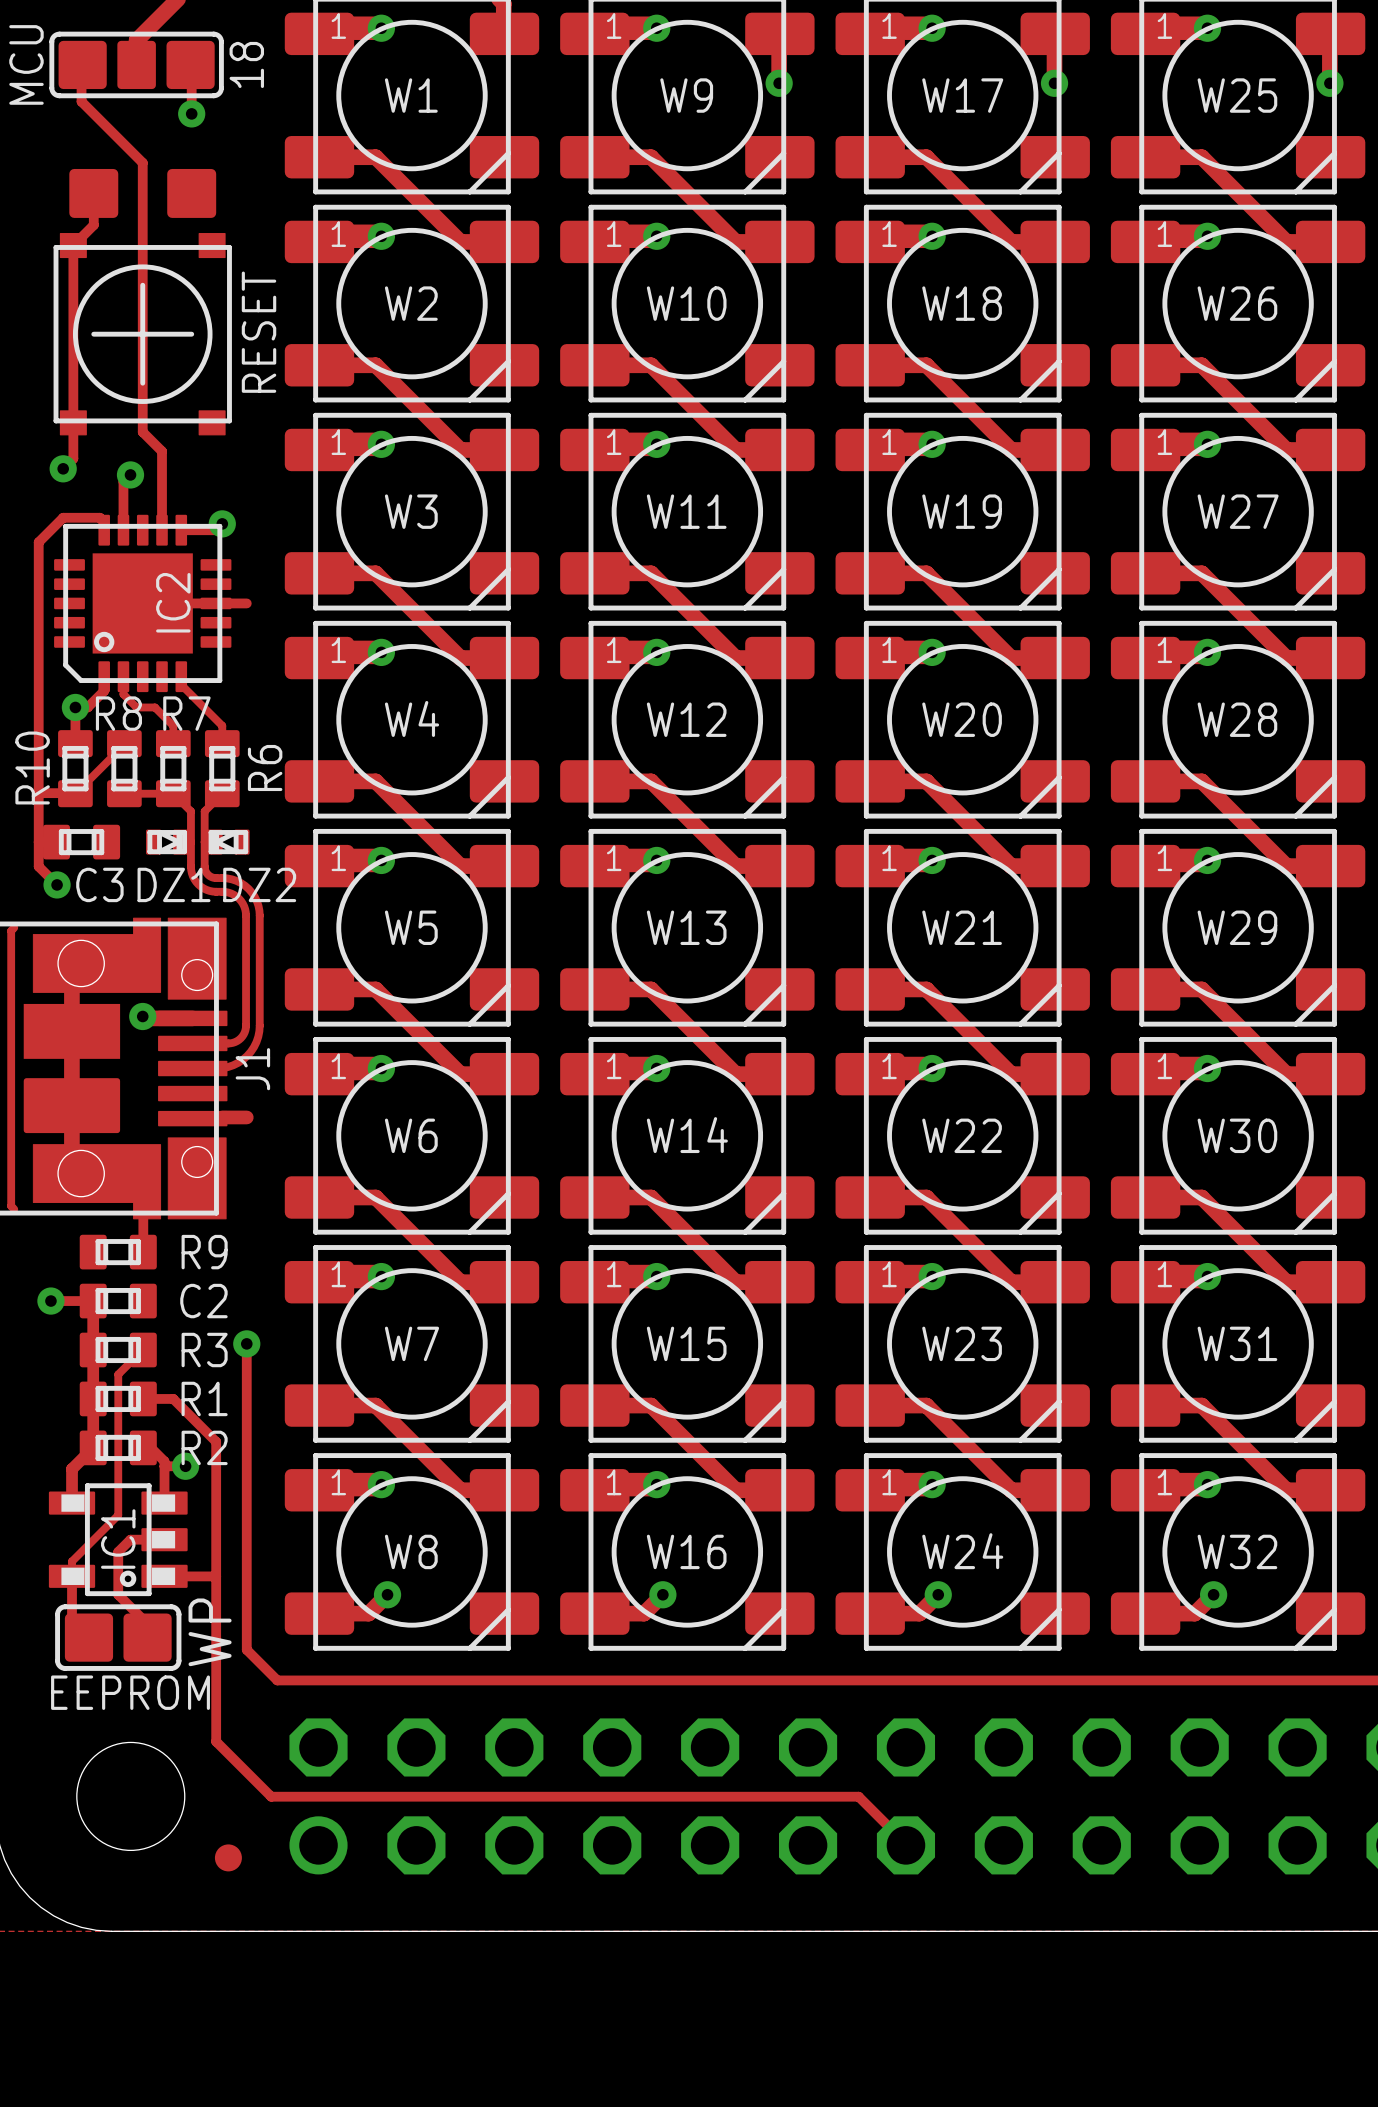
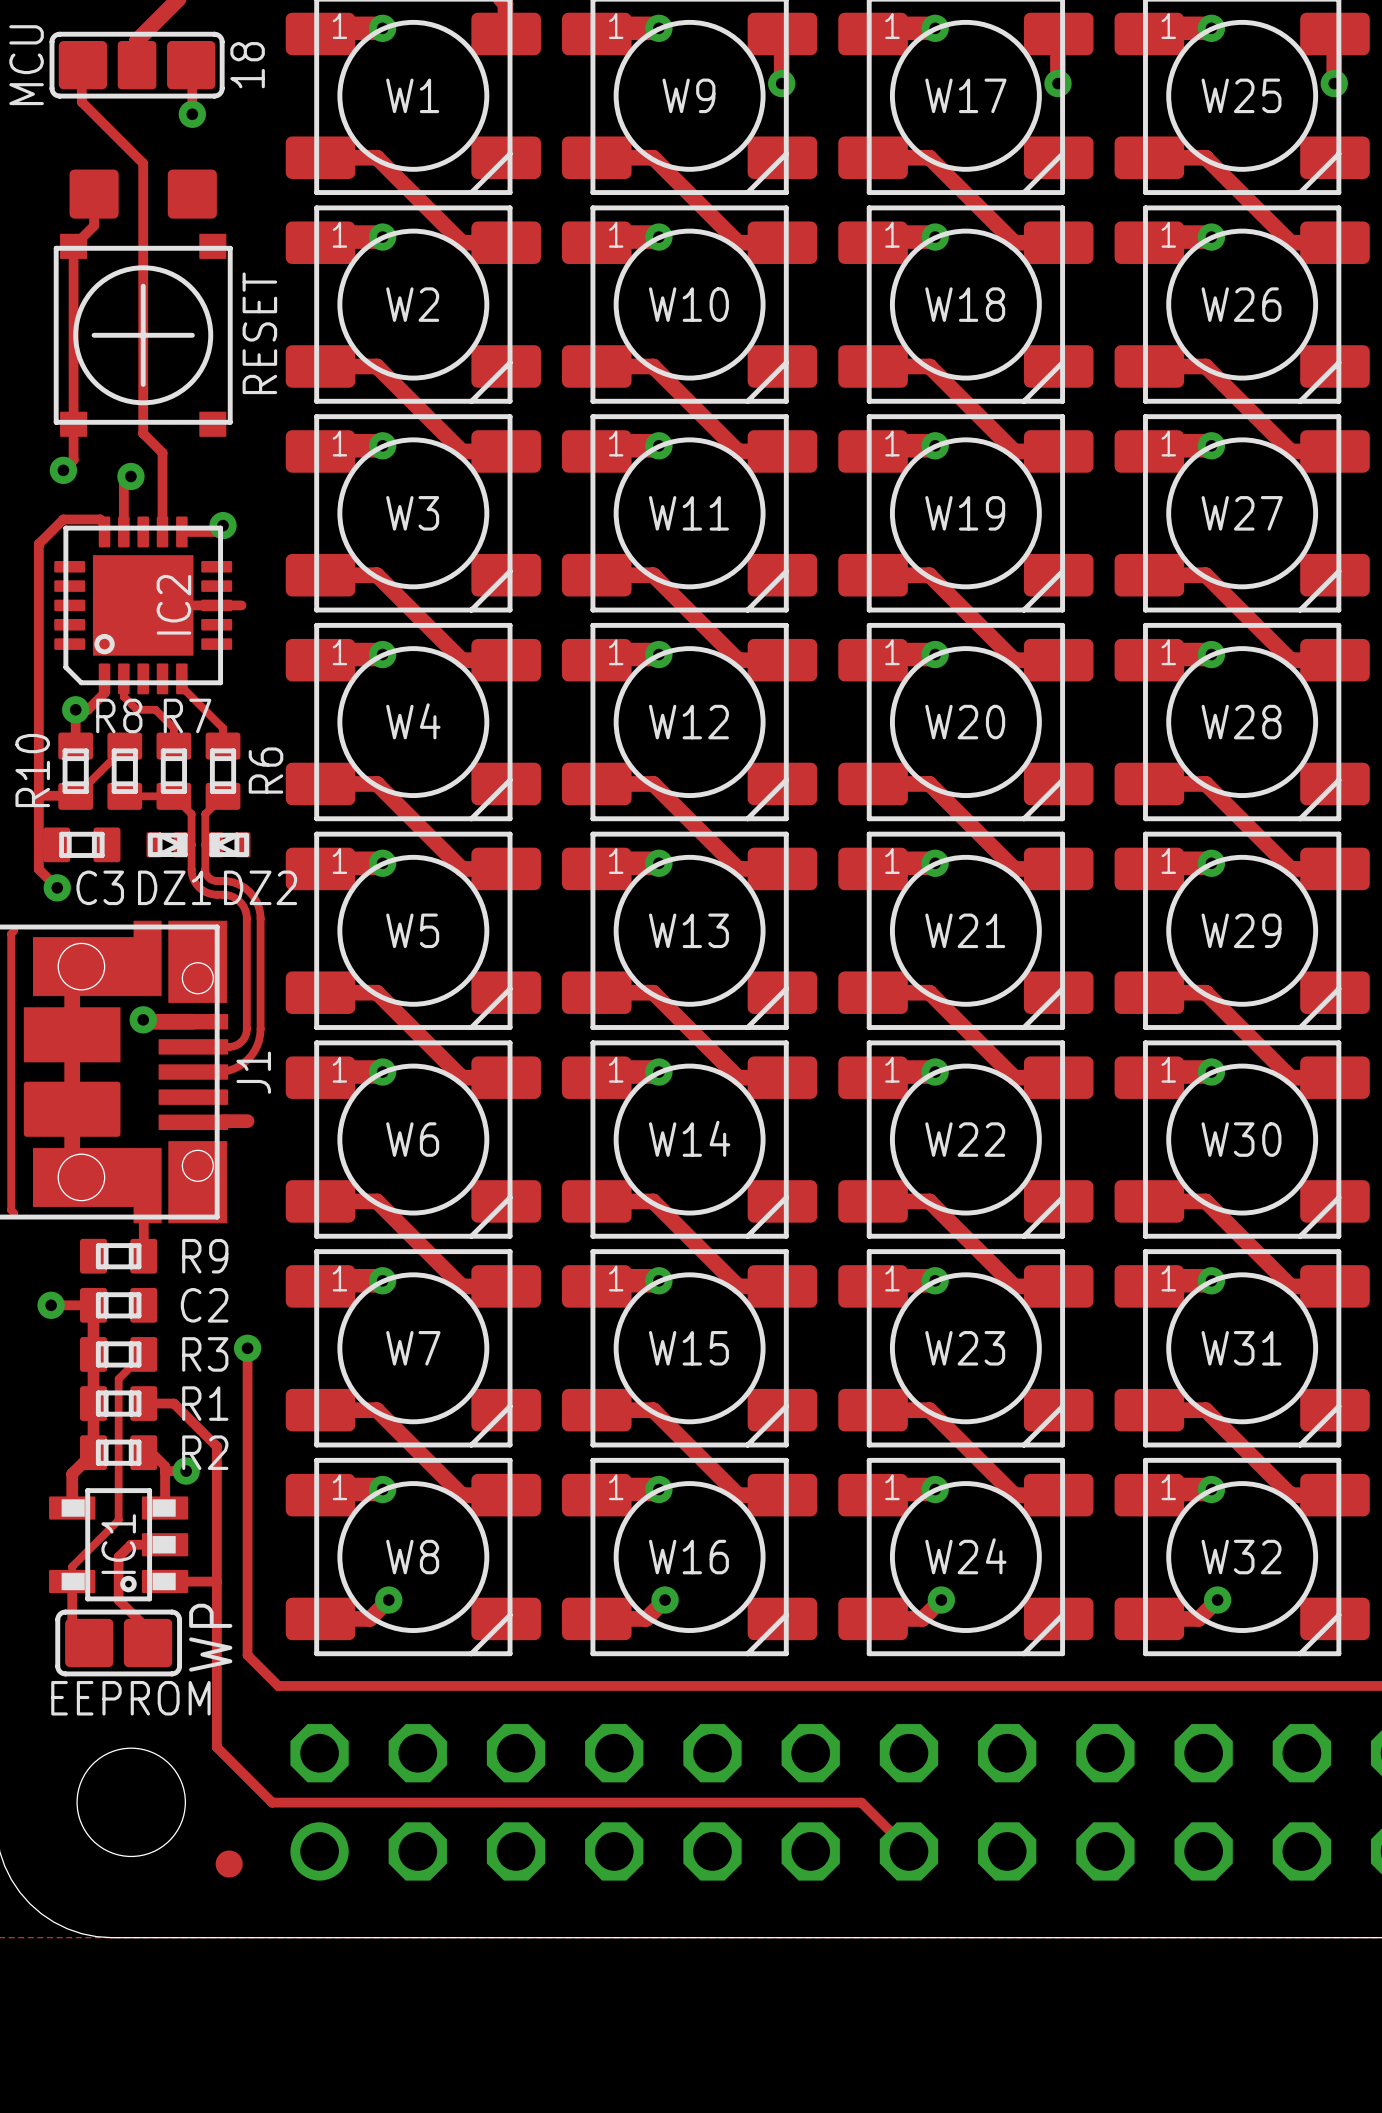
track: (240, 603) (246, 603) -> none

